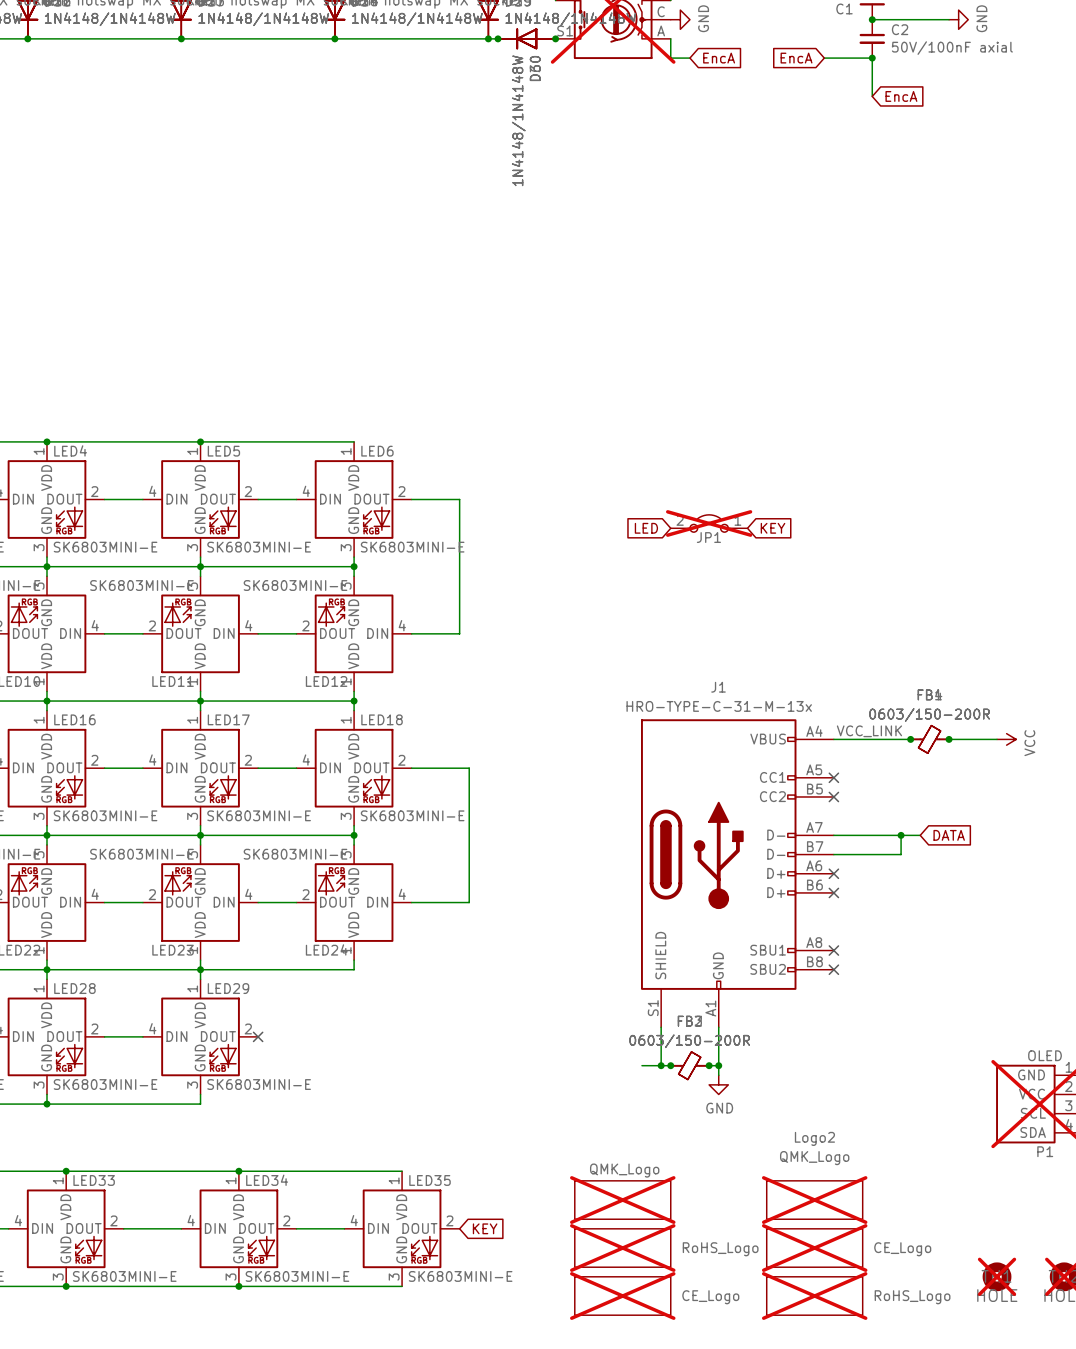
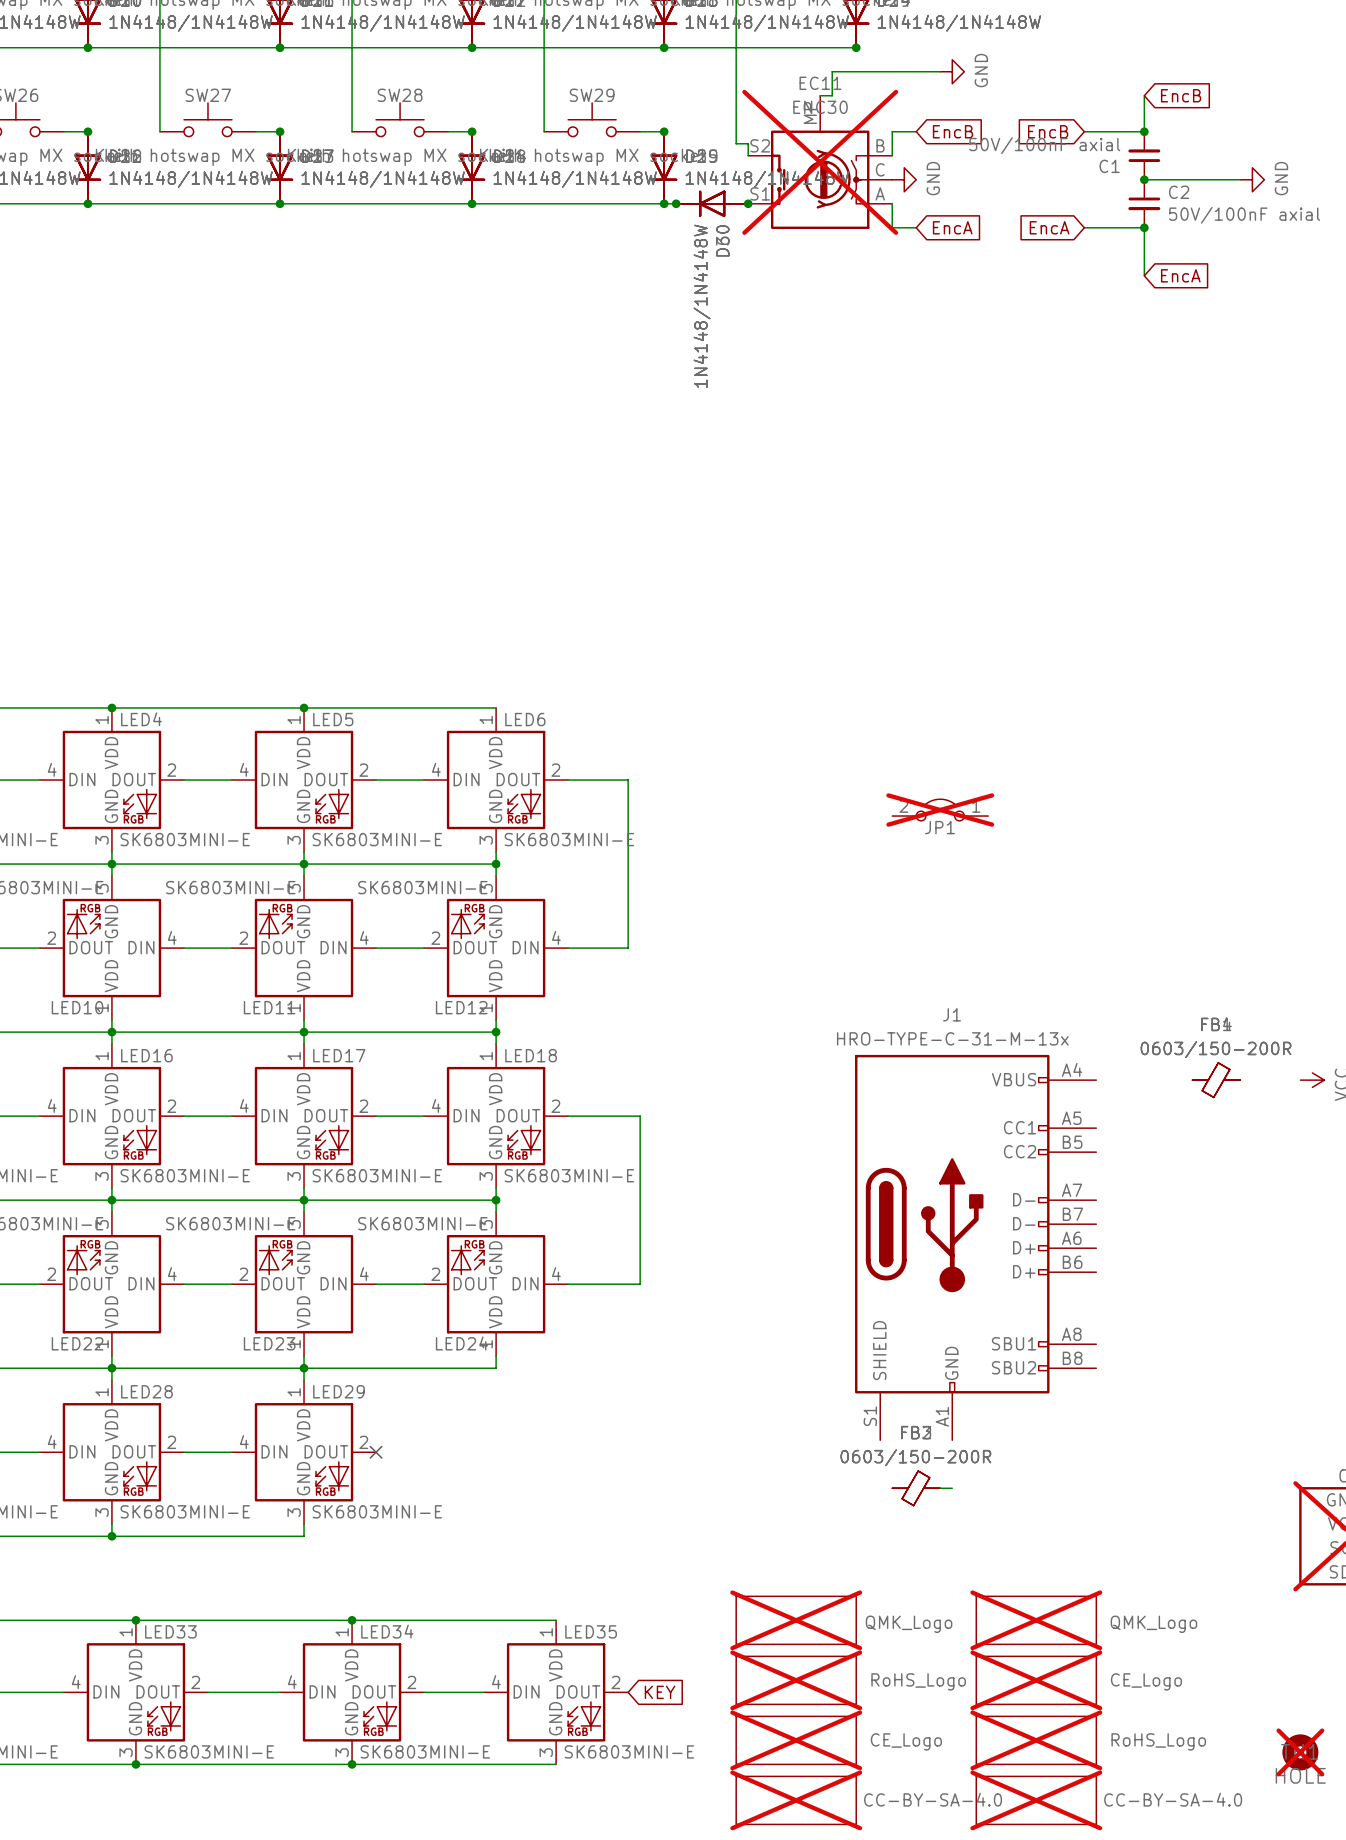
global label: LED (646, 528) -> none
global label: KEY (773, 528) -> none
label: VCC_LINK (869, 731) -> none
wire: (833, 739) (910, 739) -> none
junction: (910, 739) -> none
wire: (949, 739) (997, 739) -> none
junction: (949, 739) -> none
no-connect mark: (833, 777) -> none
no-connect mark: (833, 796) -> none
wire: (833, 835) (920, 835) -> none
wire: (901, 835) (901, 854) (833, 854) -> none
junction: (901, 835) -> none
global label: DATA (949, 835) -> none
no-connect mark: (833, 873) -> none
no-connect mark: (833, 892) -> none
no-connect mark: (833, 950) -> none
no-connect mark: (833, 969) -> none
wire: (661, 1027) (661, 1065) -> none
wire: (718, 1027) (718, 1075) -> none
wire: (641, 1065) (670, 1065) -> none
junction: (661, 1065) -> none
junction: (670, 1065) -> none
junction: (709, 1065) -> none
junction: (718, 1065) -> none
power symbol: GND (718, 1084) -> none
part value position: QMK_Logo (624, 1170) -> QMK_Logo (909, 1624)
part: none -> QMK_Logo (1036, 1620)
part position: (622, 1200) -> (796, 1620)
Logo2: QMK_Logo (814, 1200) -> none
part position: (622, 1248) -> (796, 1680)
part position: (814, 1248) -> (1036, 1680)
part position: (622, 1296) -> (796, 1740)
part position: (814, 1296) -> (1036, 1740)
part: none -> CC-BY-SA-4.0 (796, 1800)
part: none -> CC-BY-SA-4.0 (1036, 1800)

